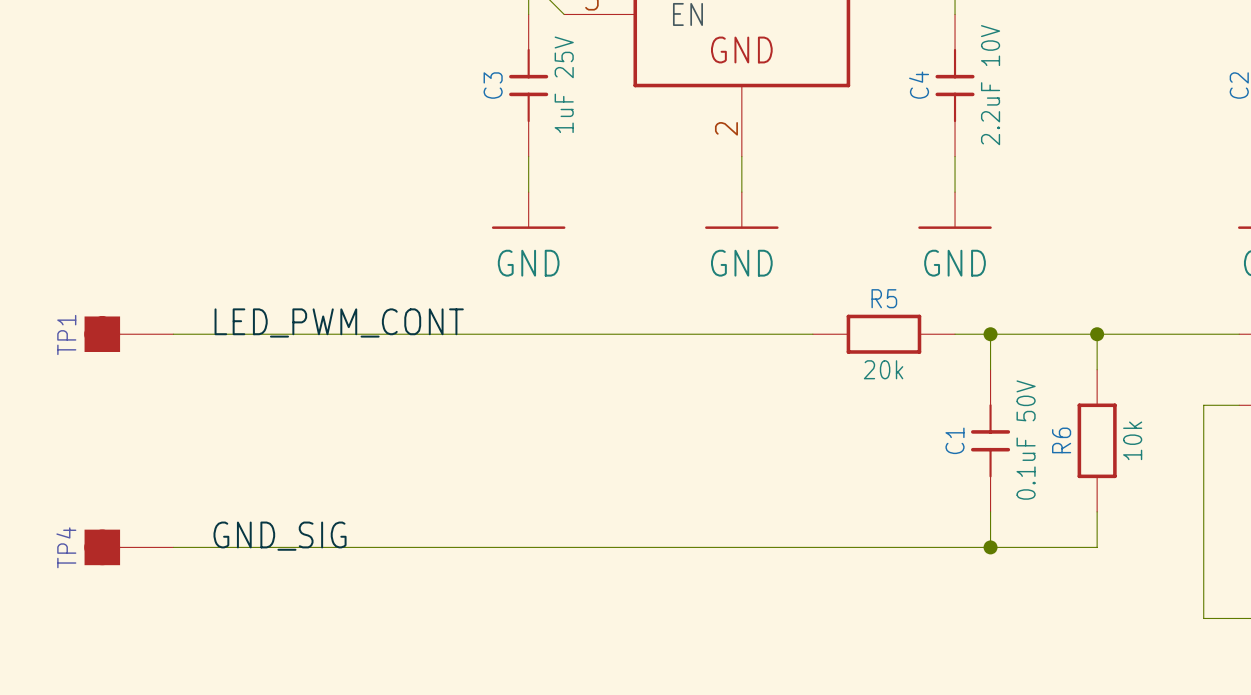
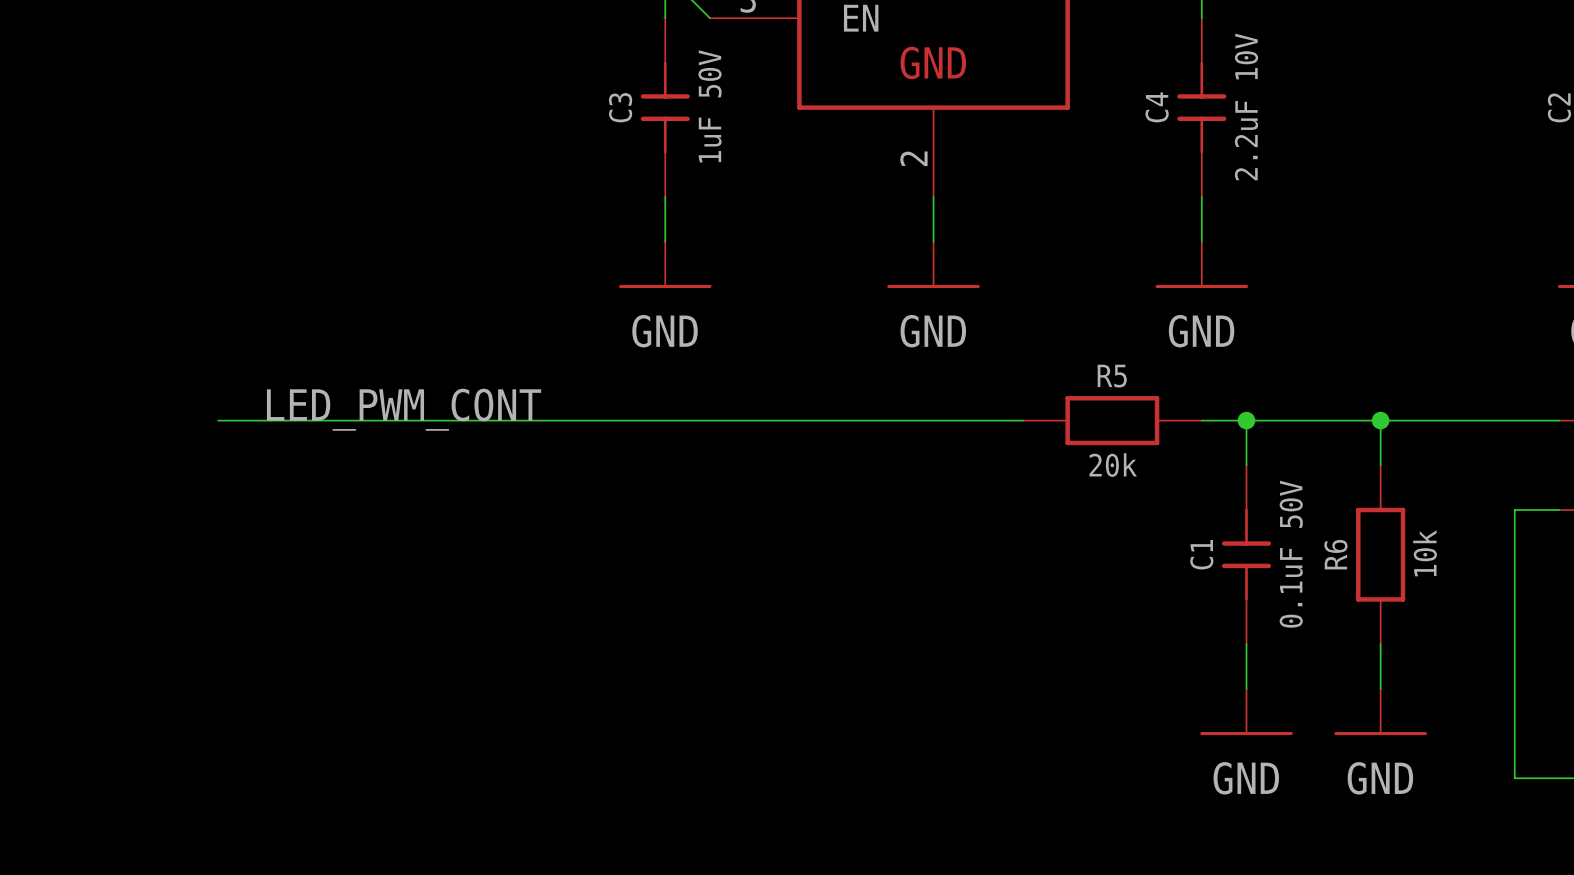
C3 value: 1uF 25V (564, 84) -> 1uF 50V (710, 106)
TP1: (128, 334) -> none
label: GND_SIG (280, 536) -> none
TP4: (128, 547) -> none
wire: (173, 547) (1097, 547) -> none
junction: (990, 547) -> none
power symbol: none -> GND (1246, 712)
power symbol: none -> GND (1380, 712)

